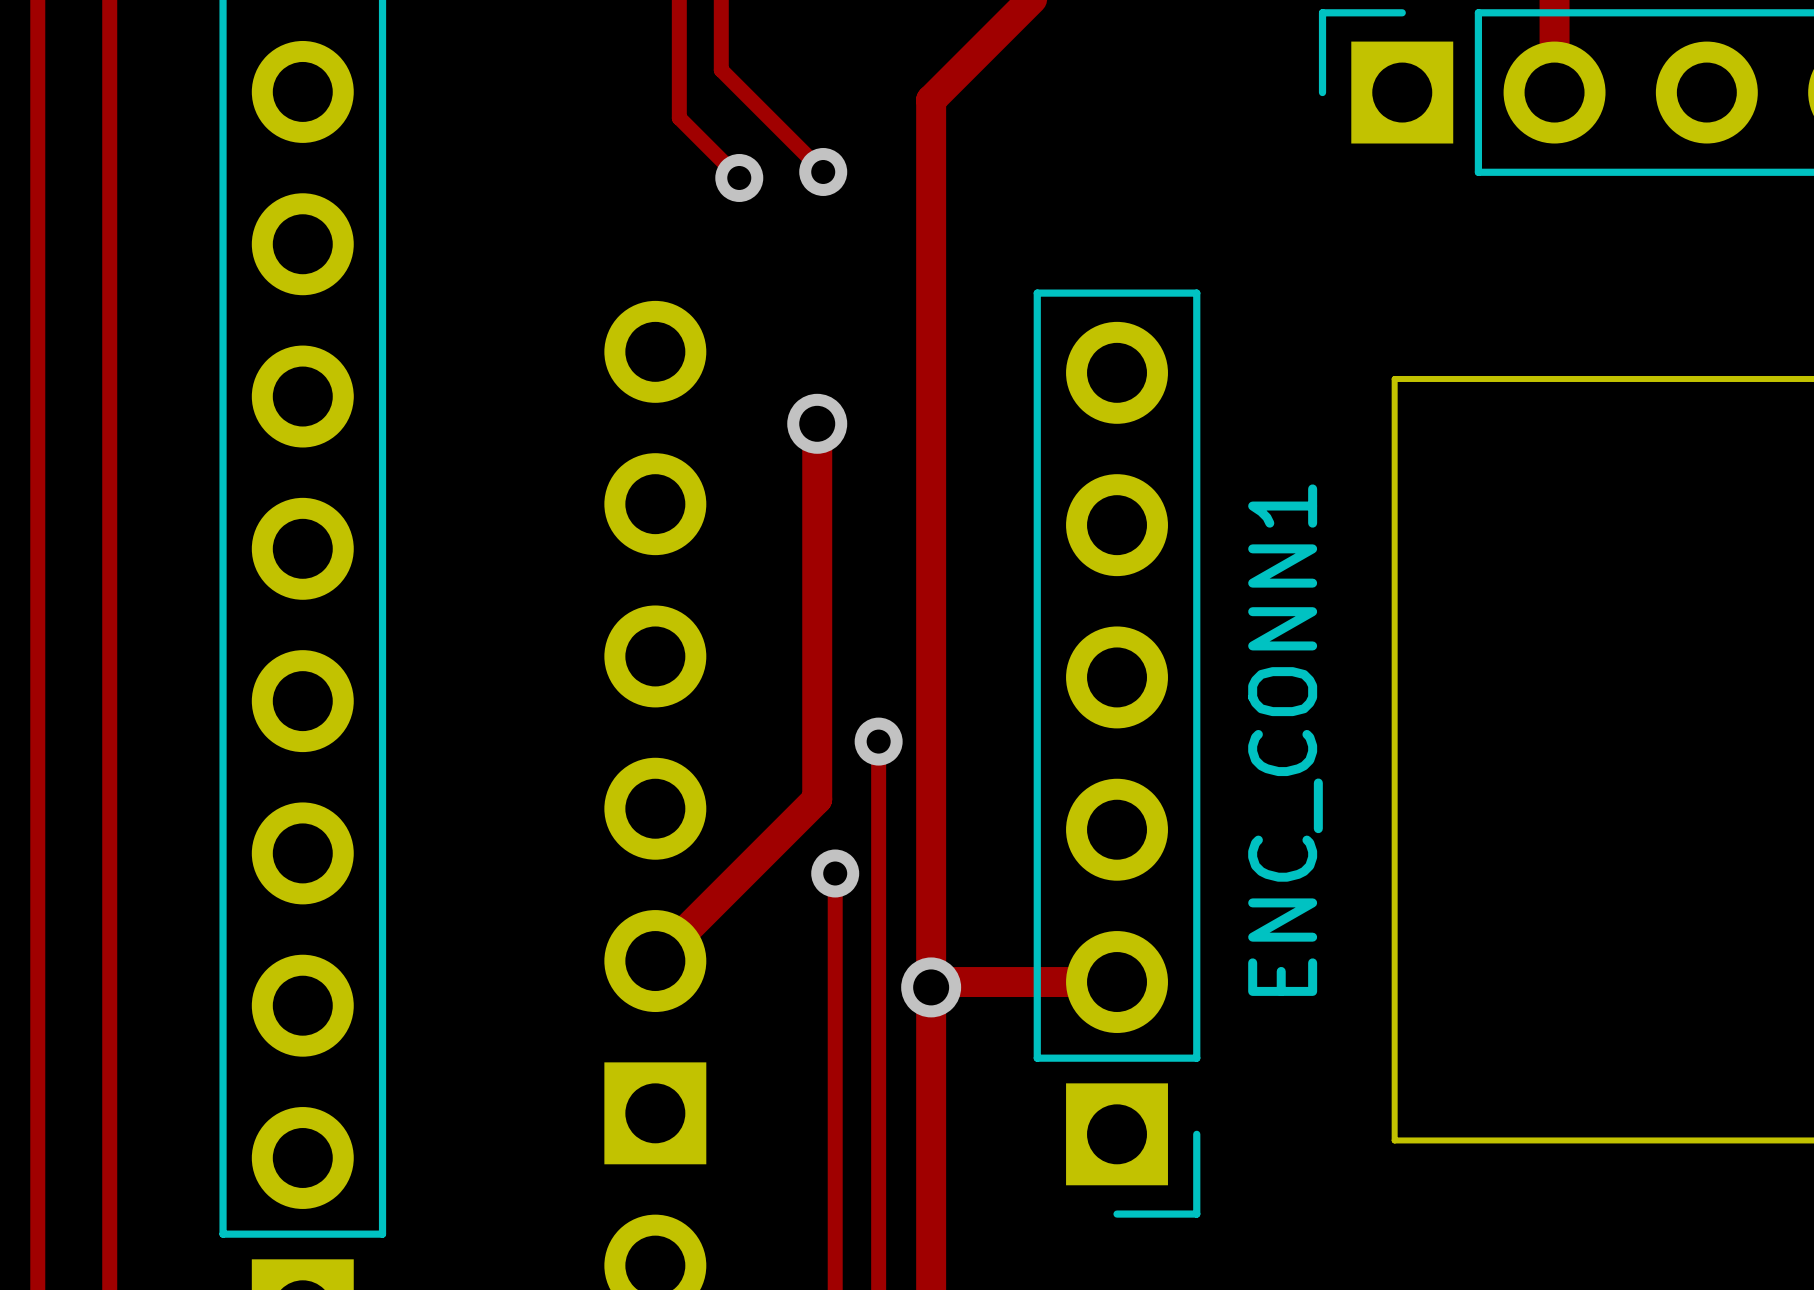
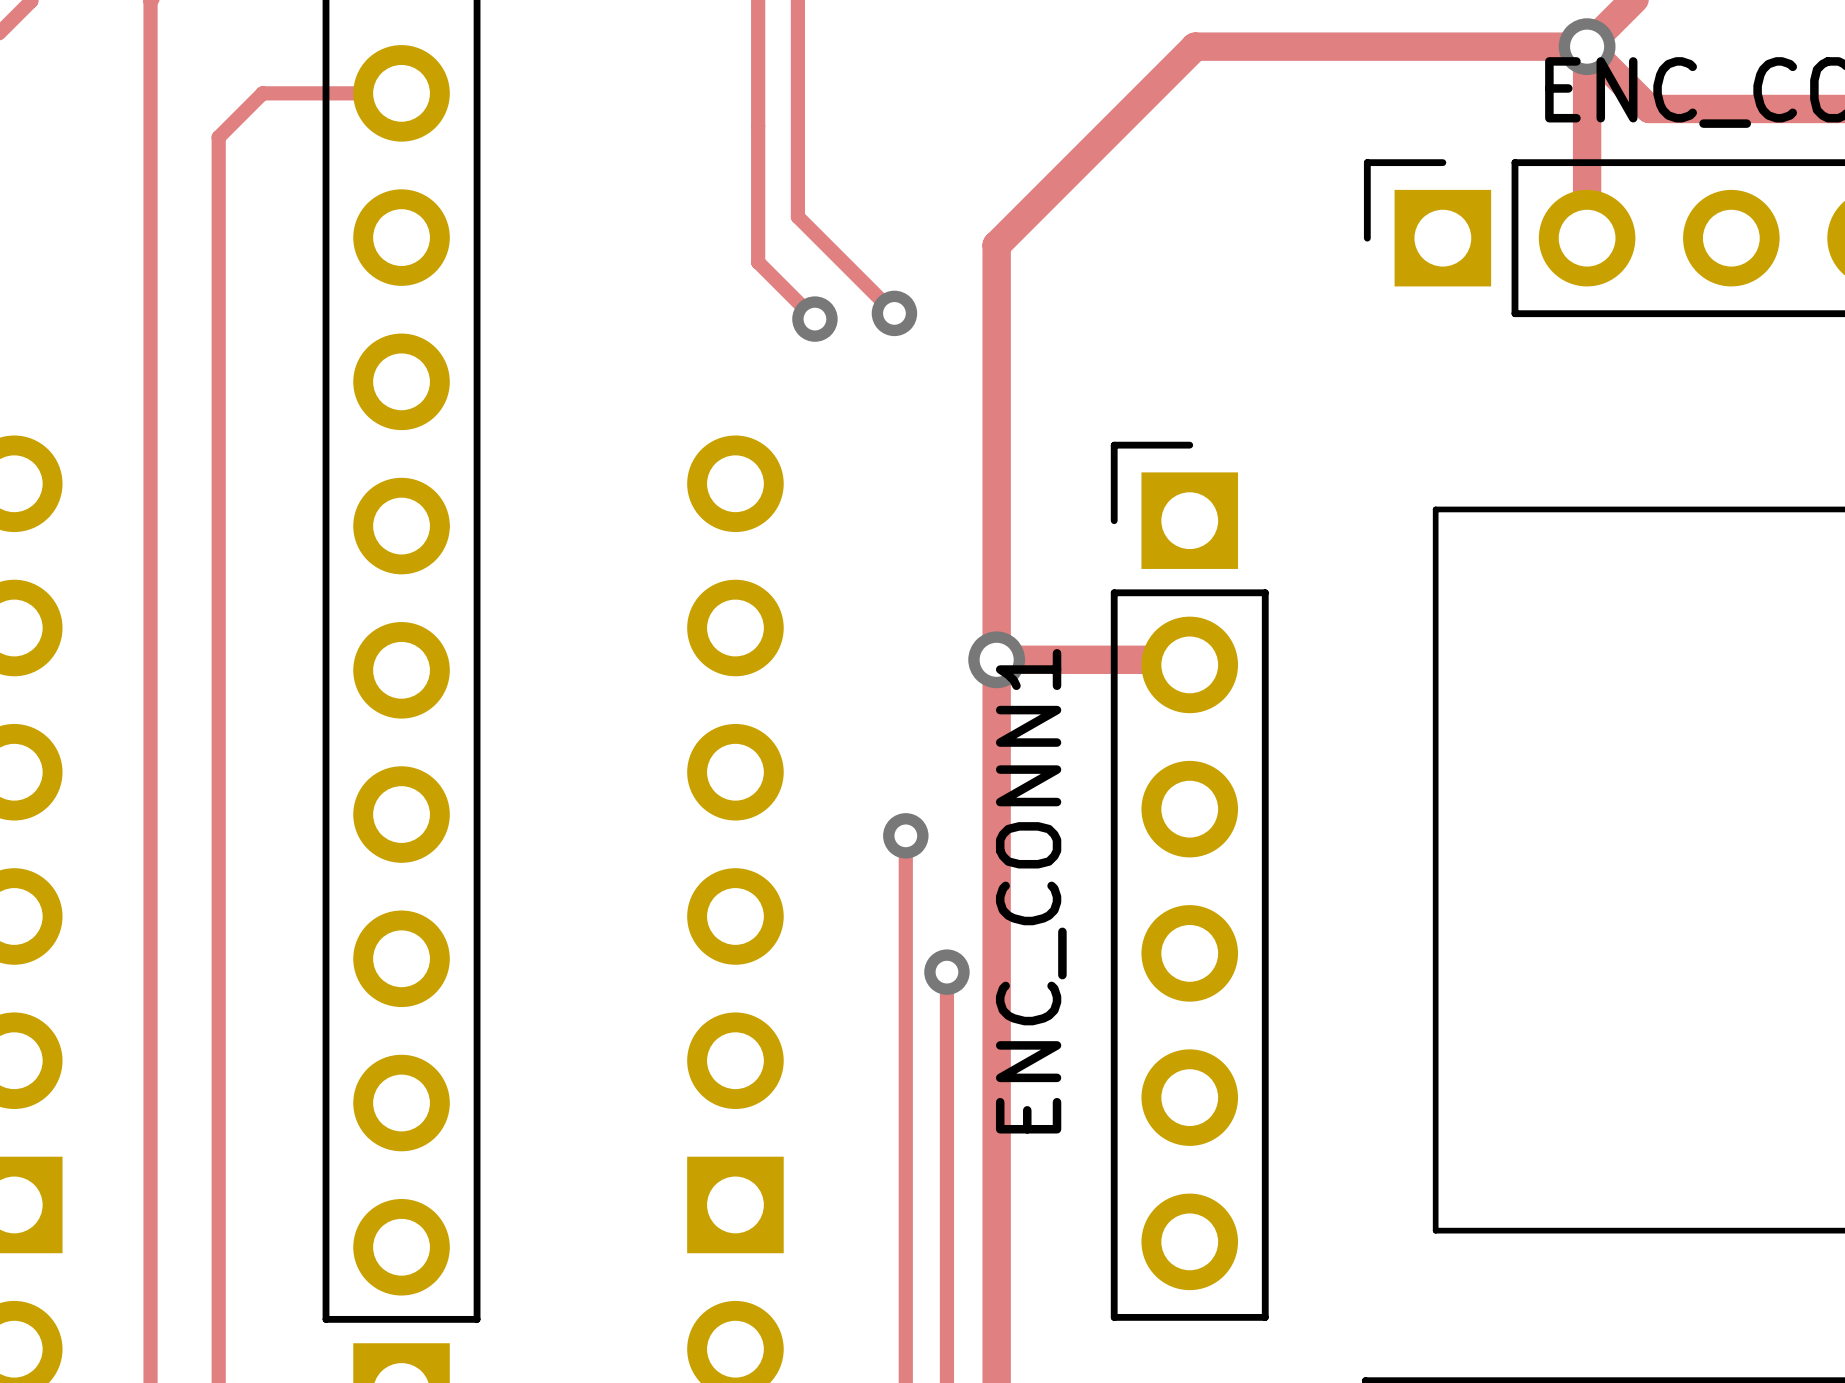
track: (817, 423) (817, 799) (655, 961) -> none
via position: (817, 423) -> (996, 659)
track: none -> (996, 659) (1184, 659) (1189, 664)
track: none -> (905, 835) (905, 977)
track: (878, 741) (878, 867) -> none
via position: (878, 741) -> (905, 835)
ENC_CONN1 rotation: 0° (1117, 753) -> 180° (1189, 881)
via position: (835, 873) -> (946, 972)
track: (1117, 982) (936, 982) (931, 987) -> none
via: (931, 987) -> none

